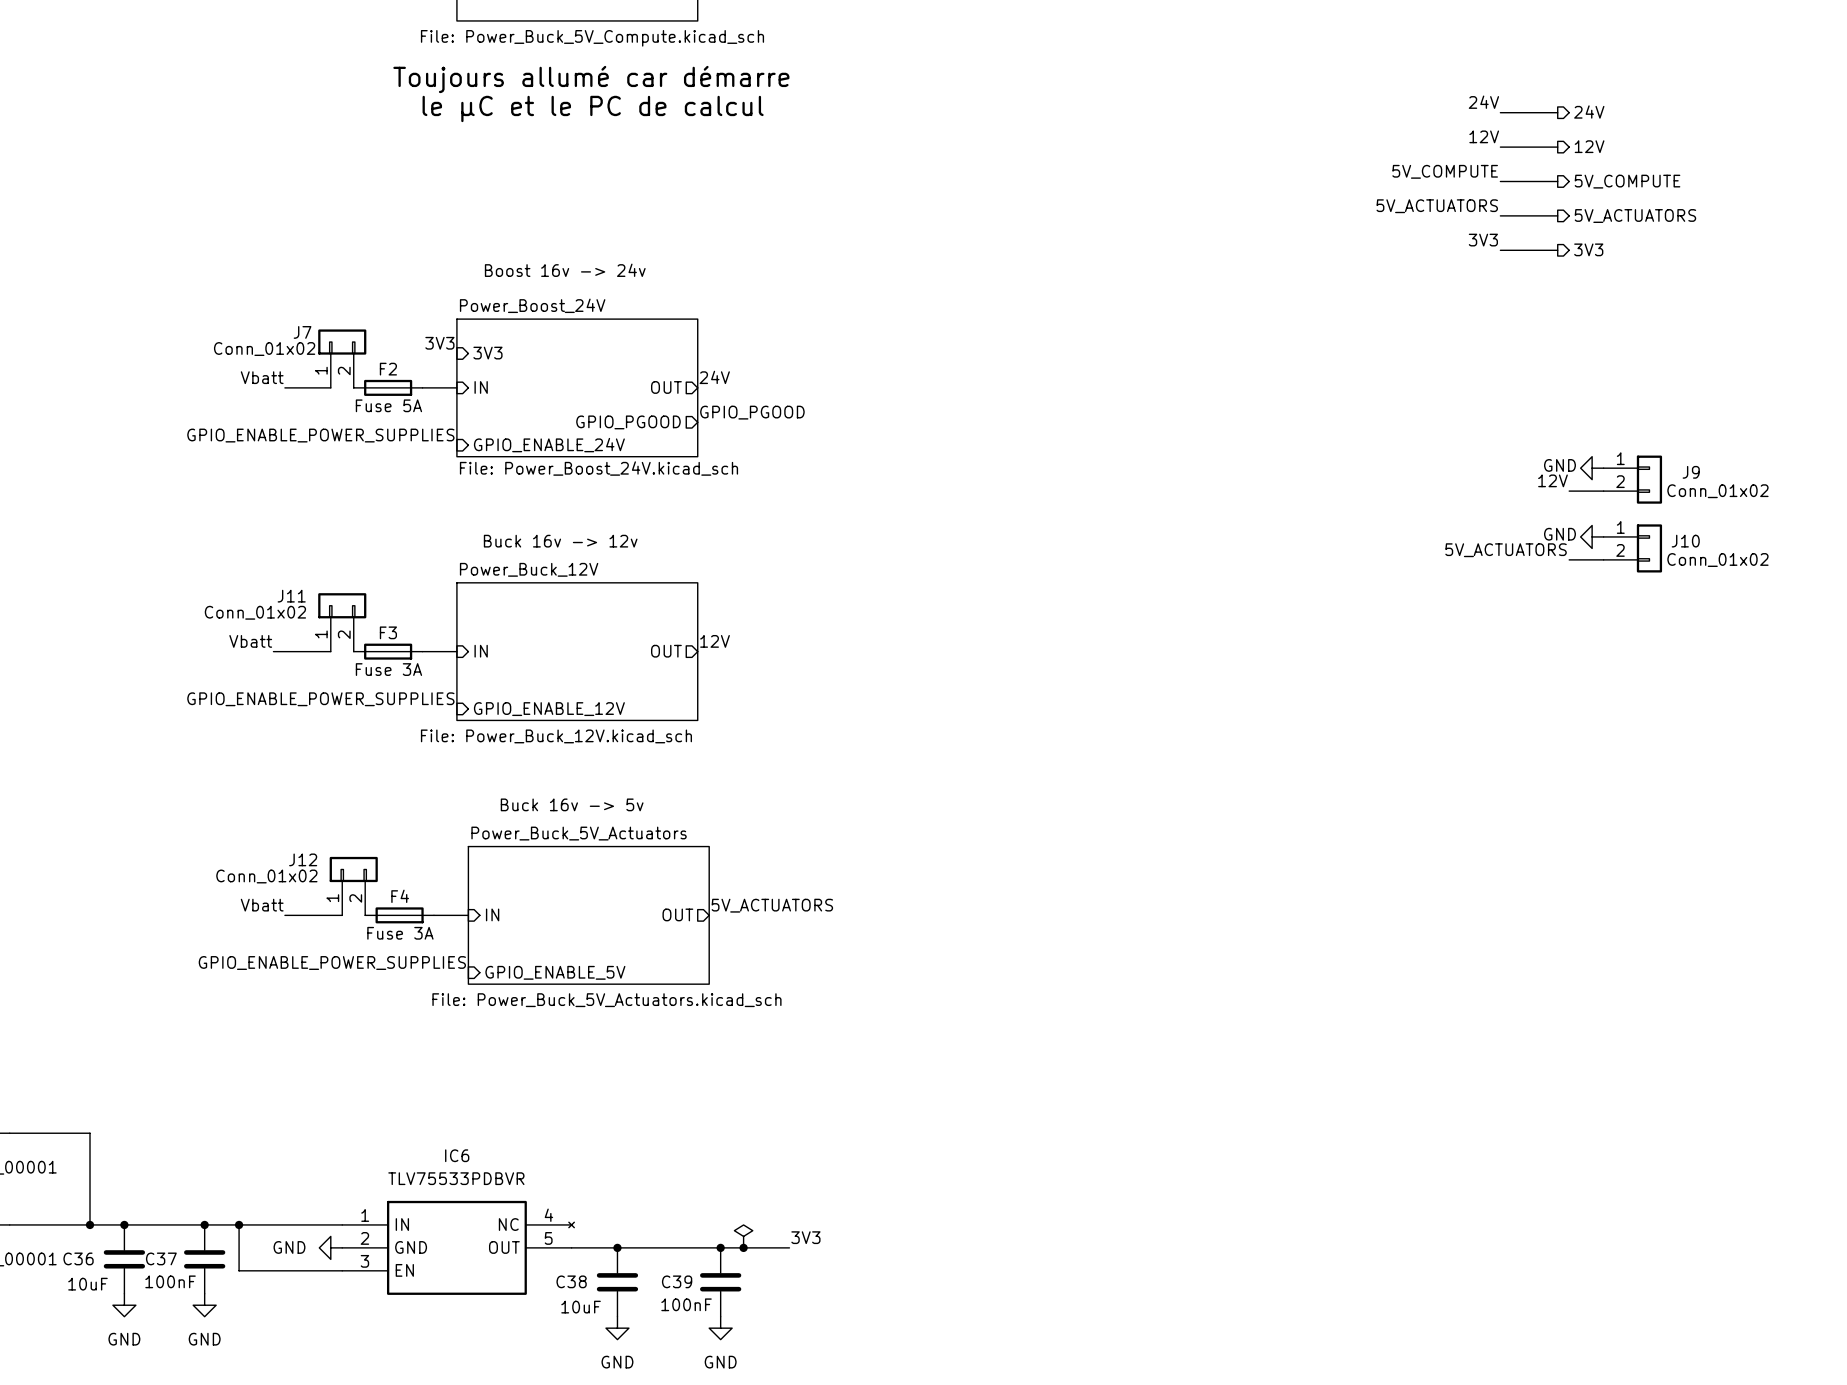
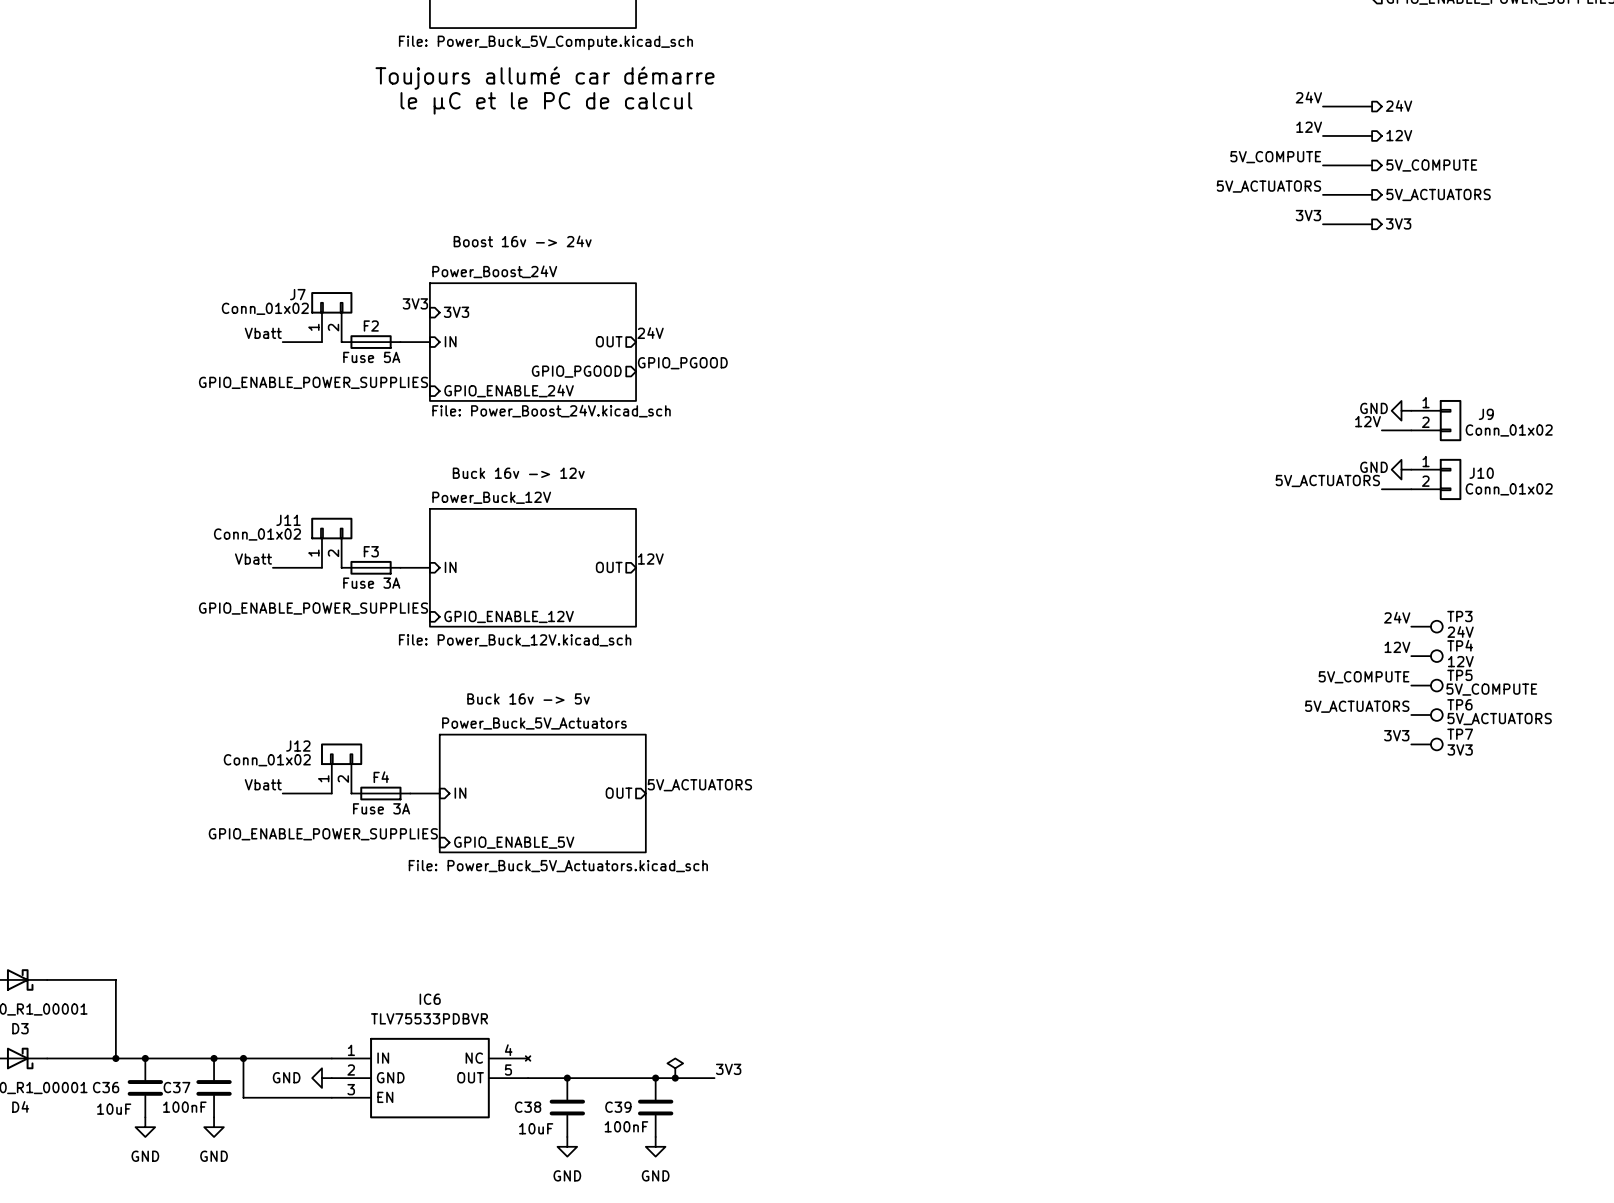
label: none -> 24V (1397, 617)
TP3: none -> 24V (1427, 626)
label: none -> 12V (1397, 647)
TP4: none -> 12V (1427, 656)
label: none -> 5V_COMPUTE (1364, 677)
TP5: none -> 5V_COMPUTE (1427, 685)
label: none -> 5V_ACTUATORS (1357, 706)
TP6: none -> 5V_ACTUATORS (1427, 715)
label: none -> 3V3 (1396, 735)
TP7: none -> 3V3 (1427, 744)

